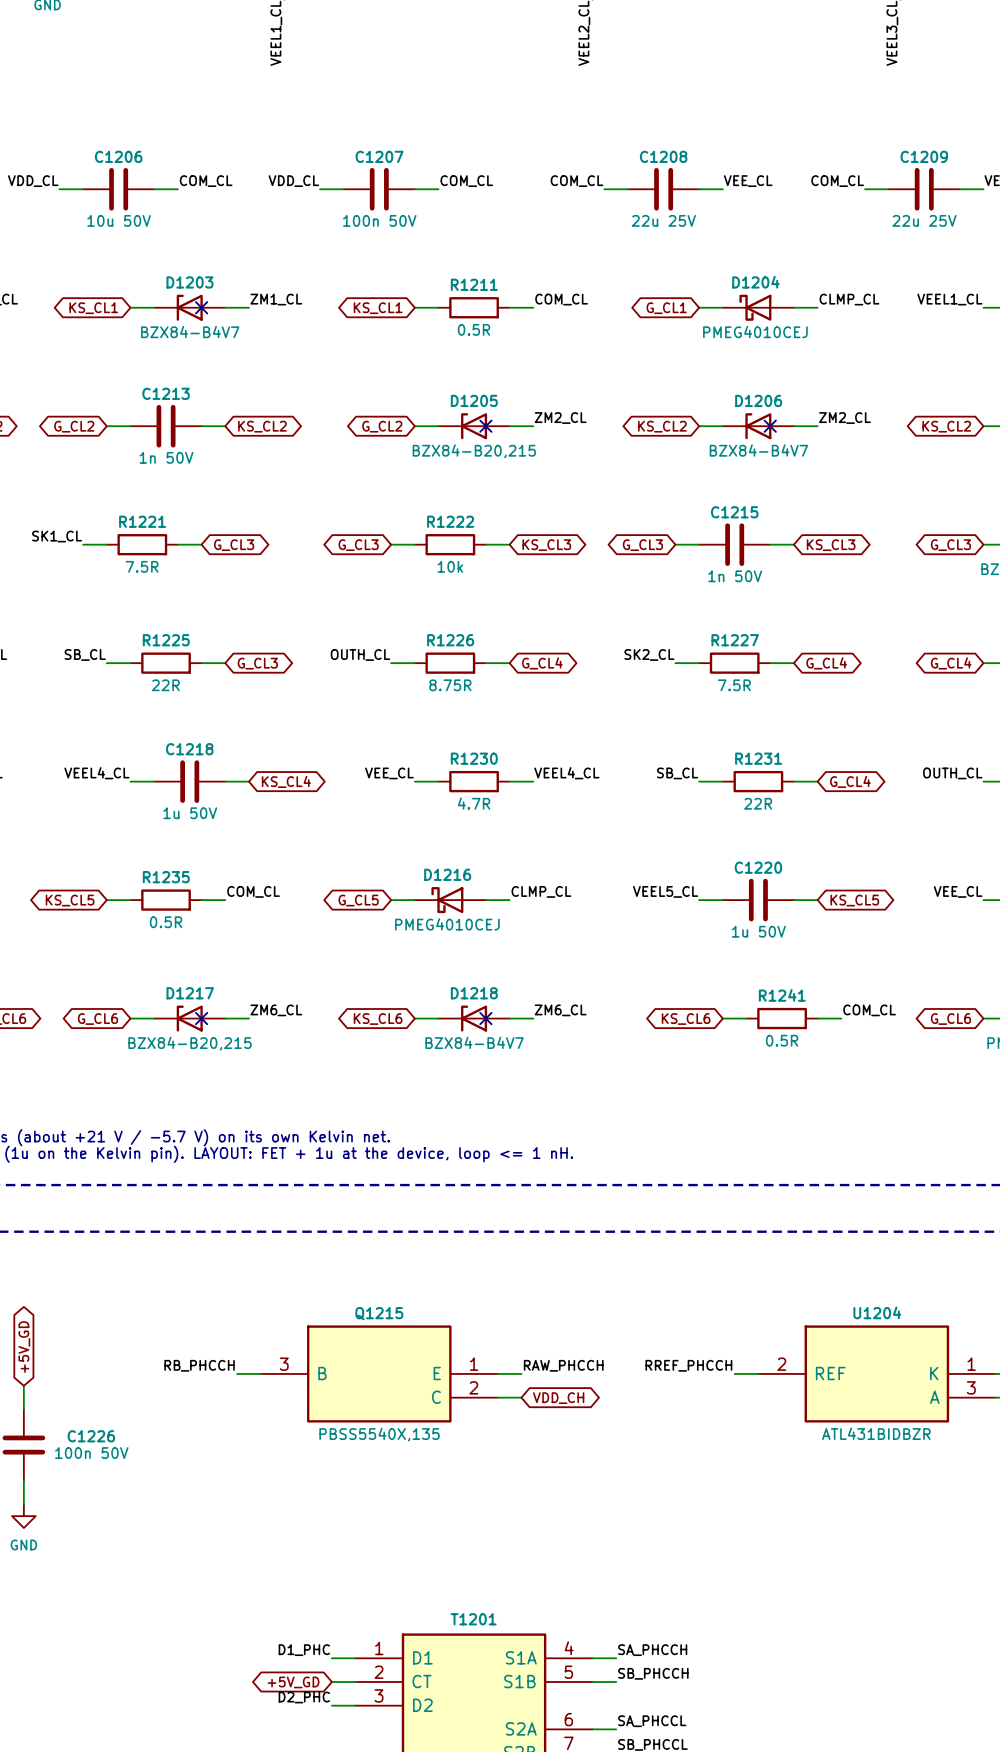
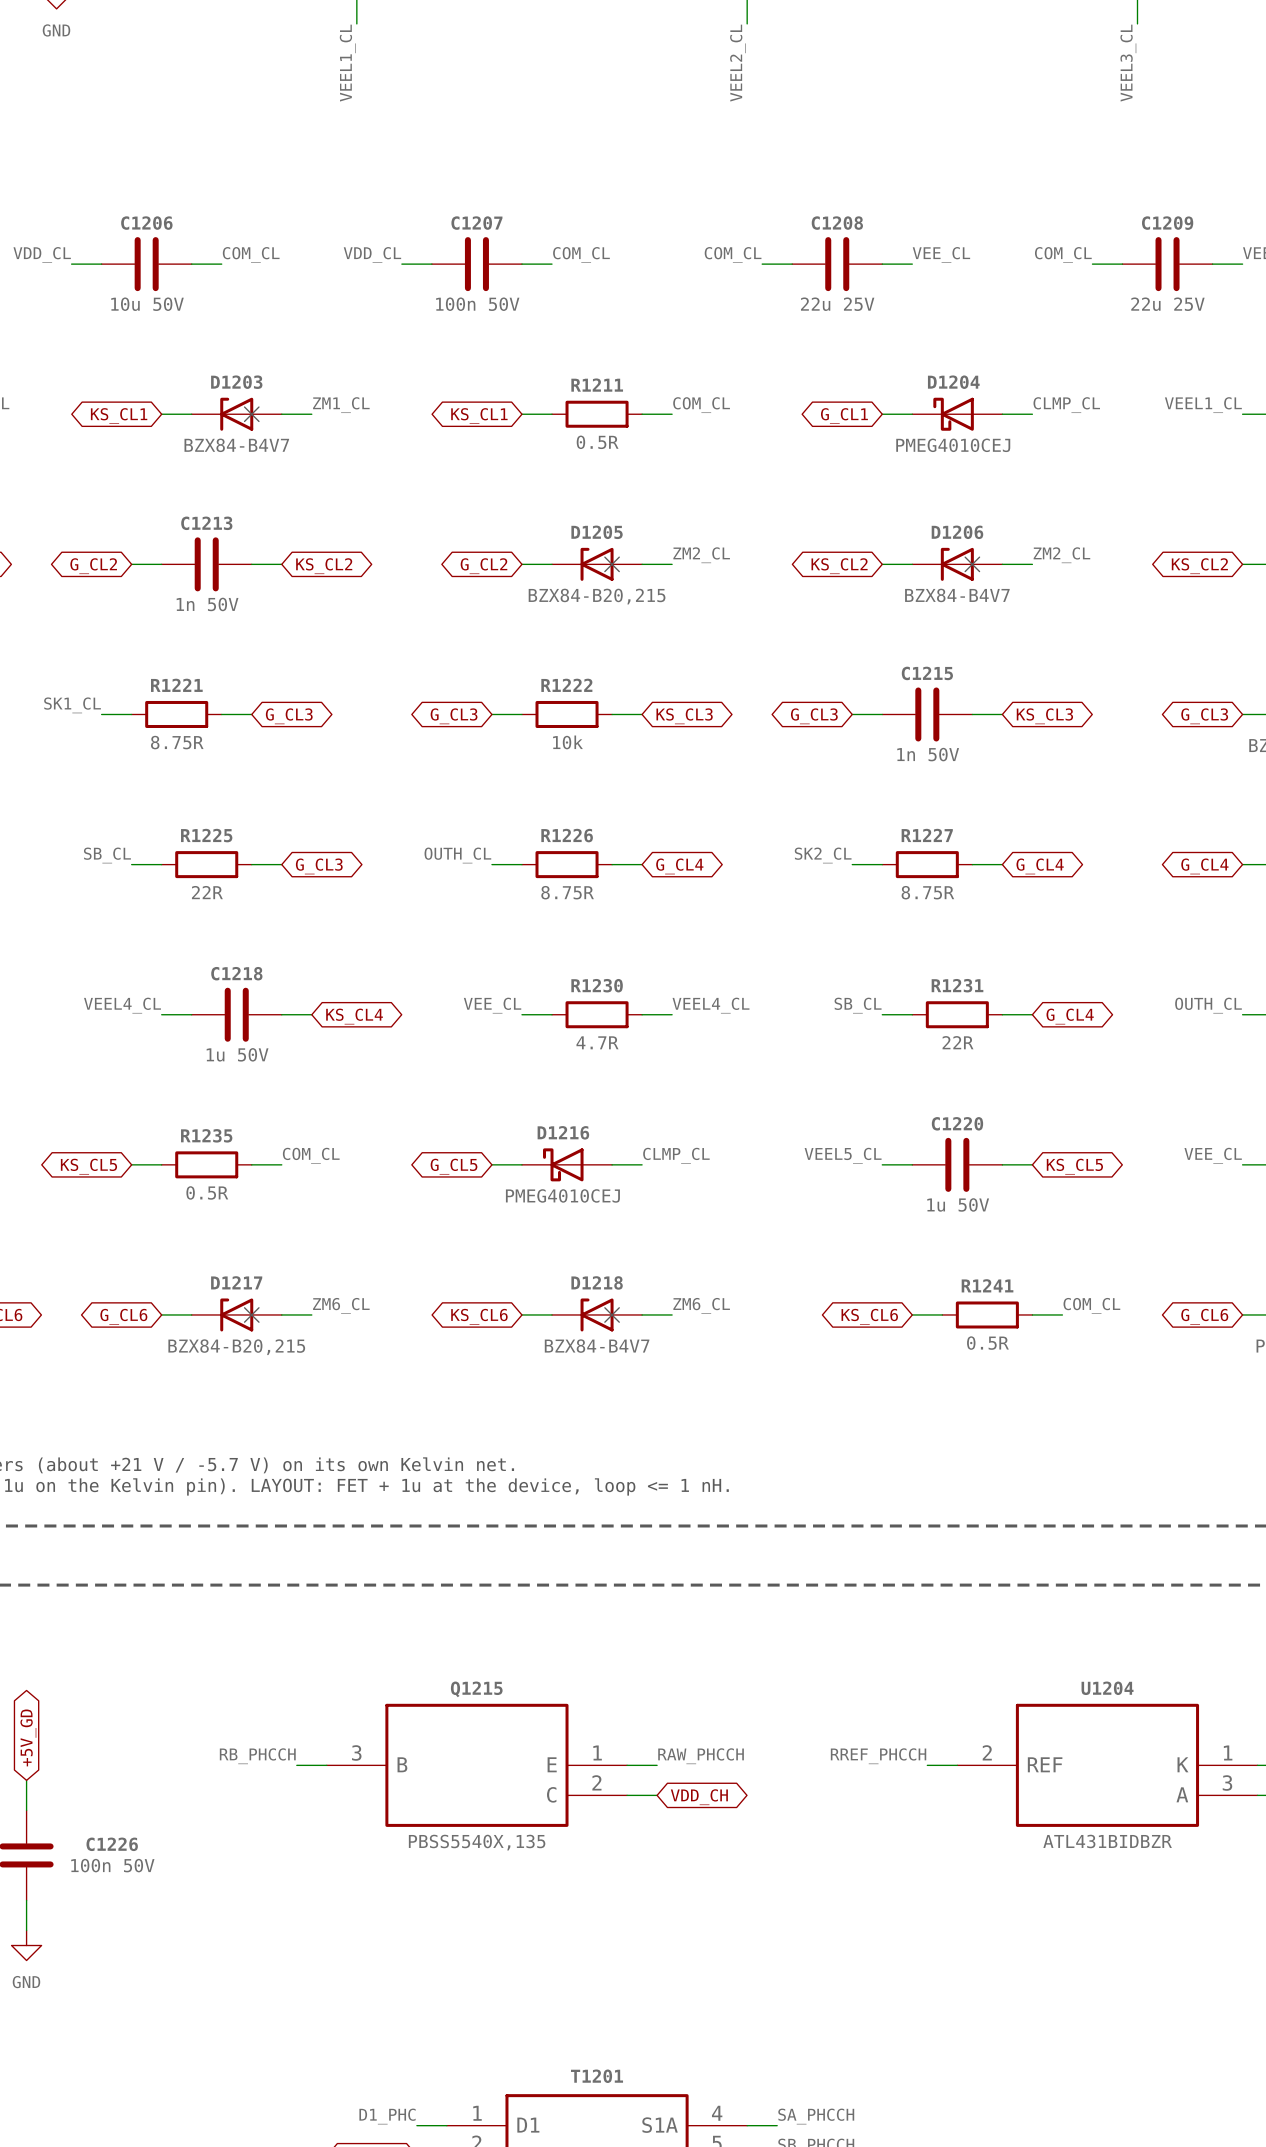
R1221 value: 7.5R (142, 566) -> 8.75R (177, 742)
R1227 value: 7.5R (734, 685) -> 8.75R (927, 892)

